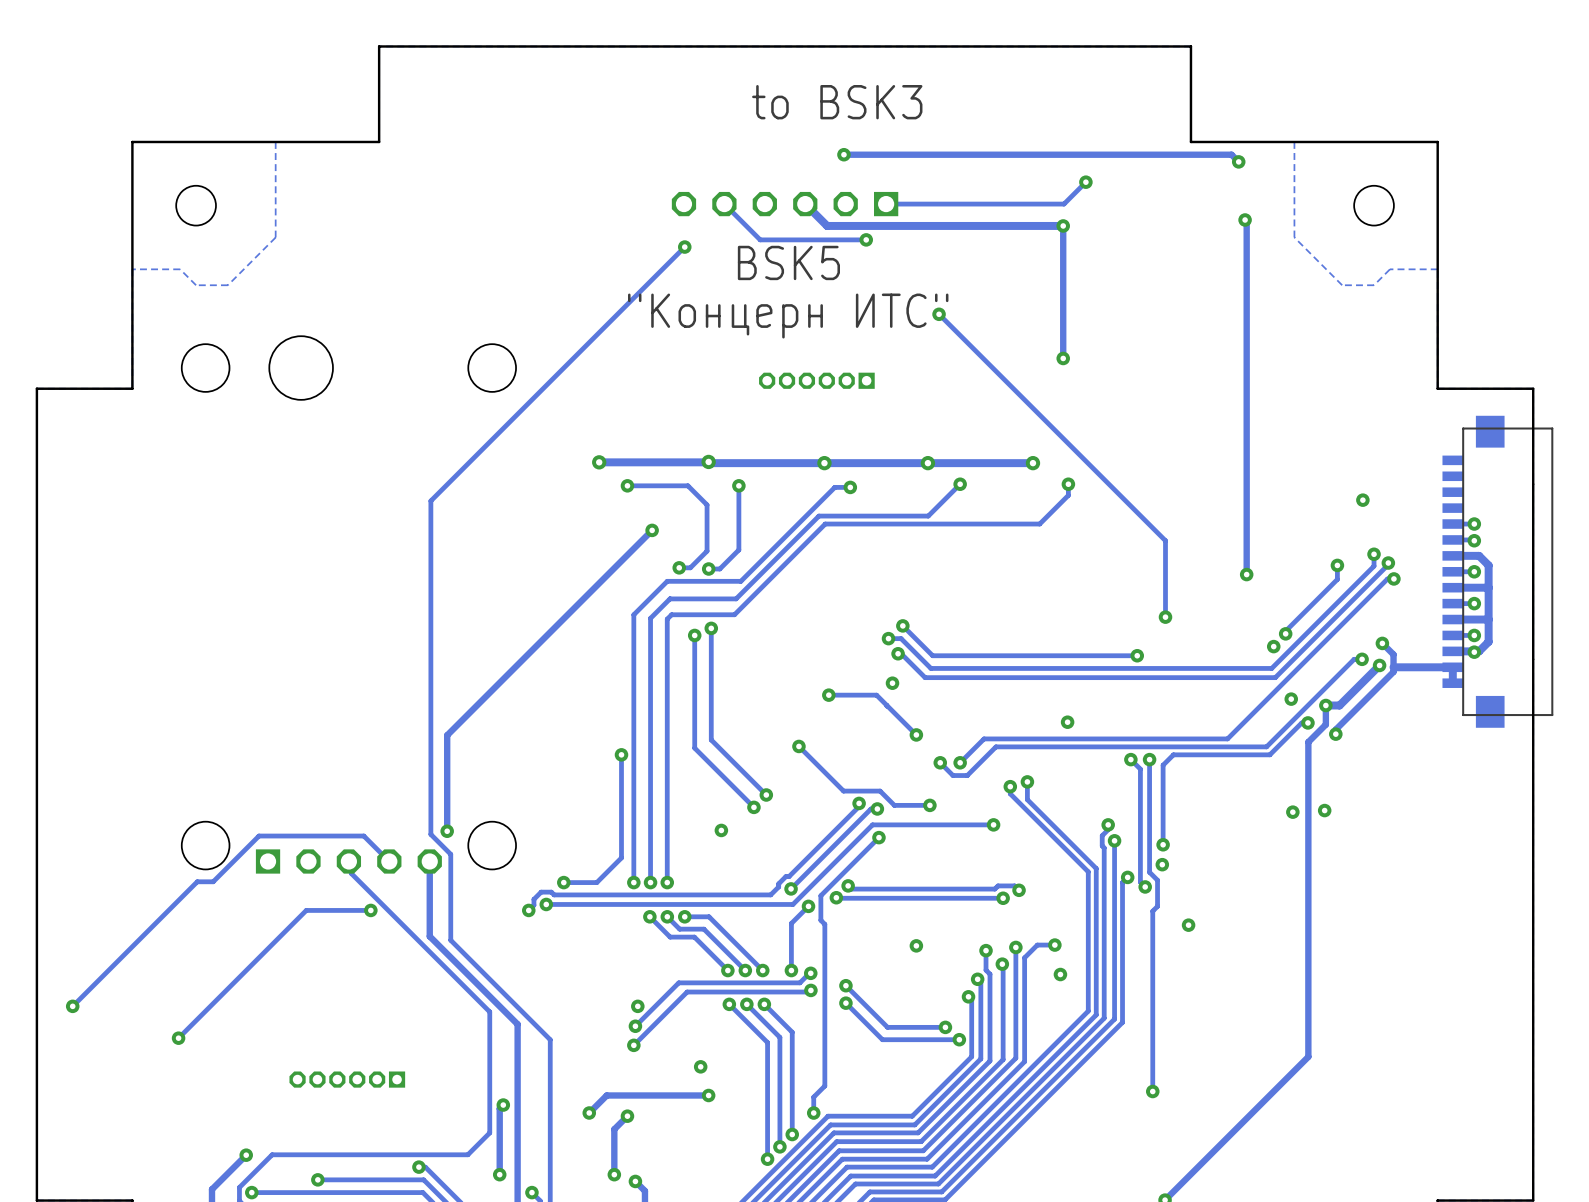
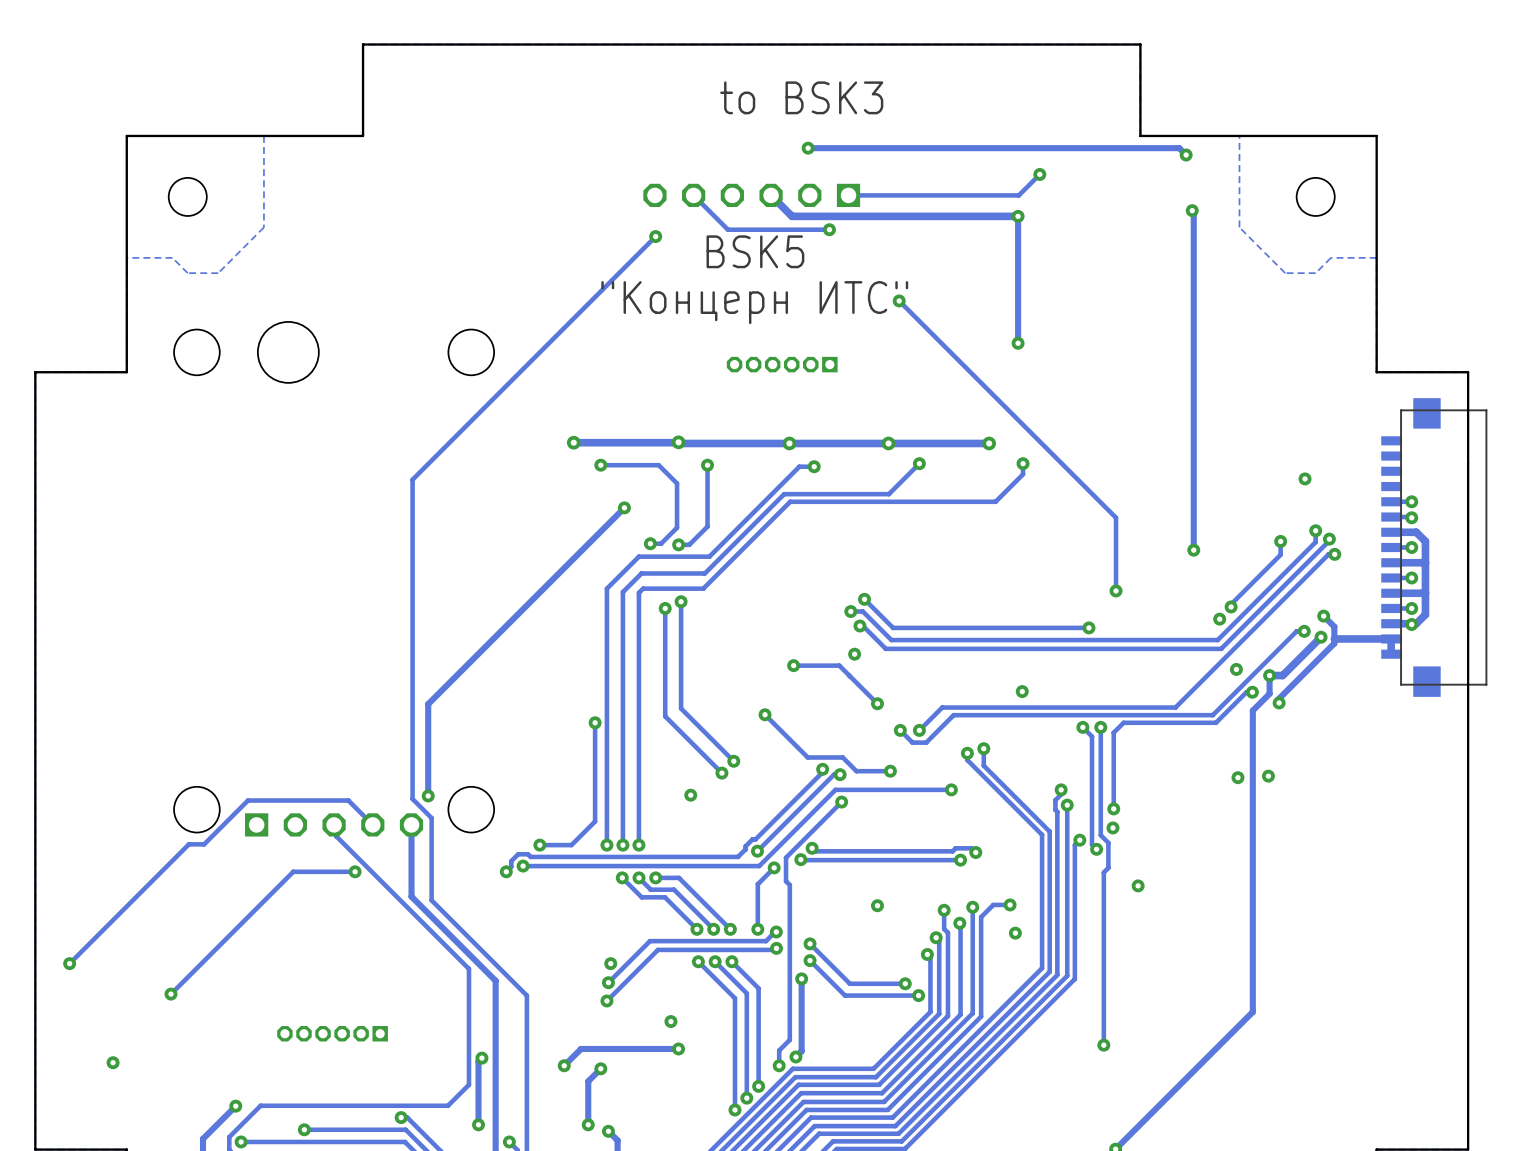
track: none -> (801, 978) (801, 1051) (795, 1056)
via: none -> (801, 978)
via: none -> (795, 1056)
via: none -> (113, 1062)

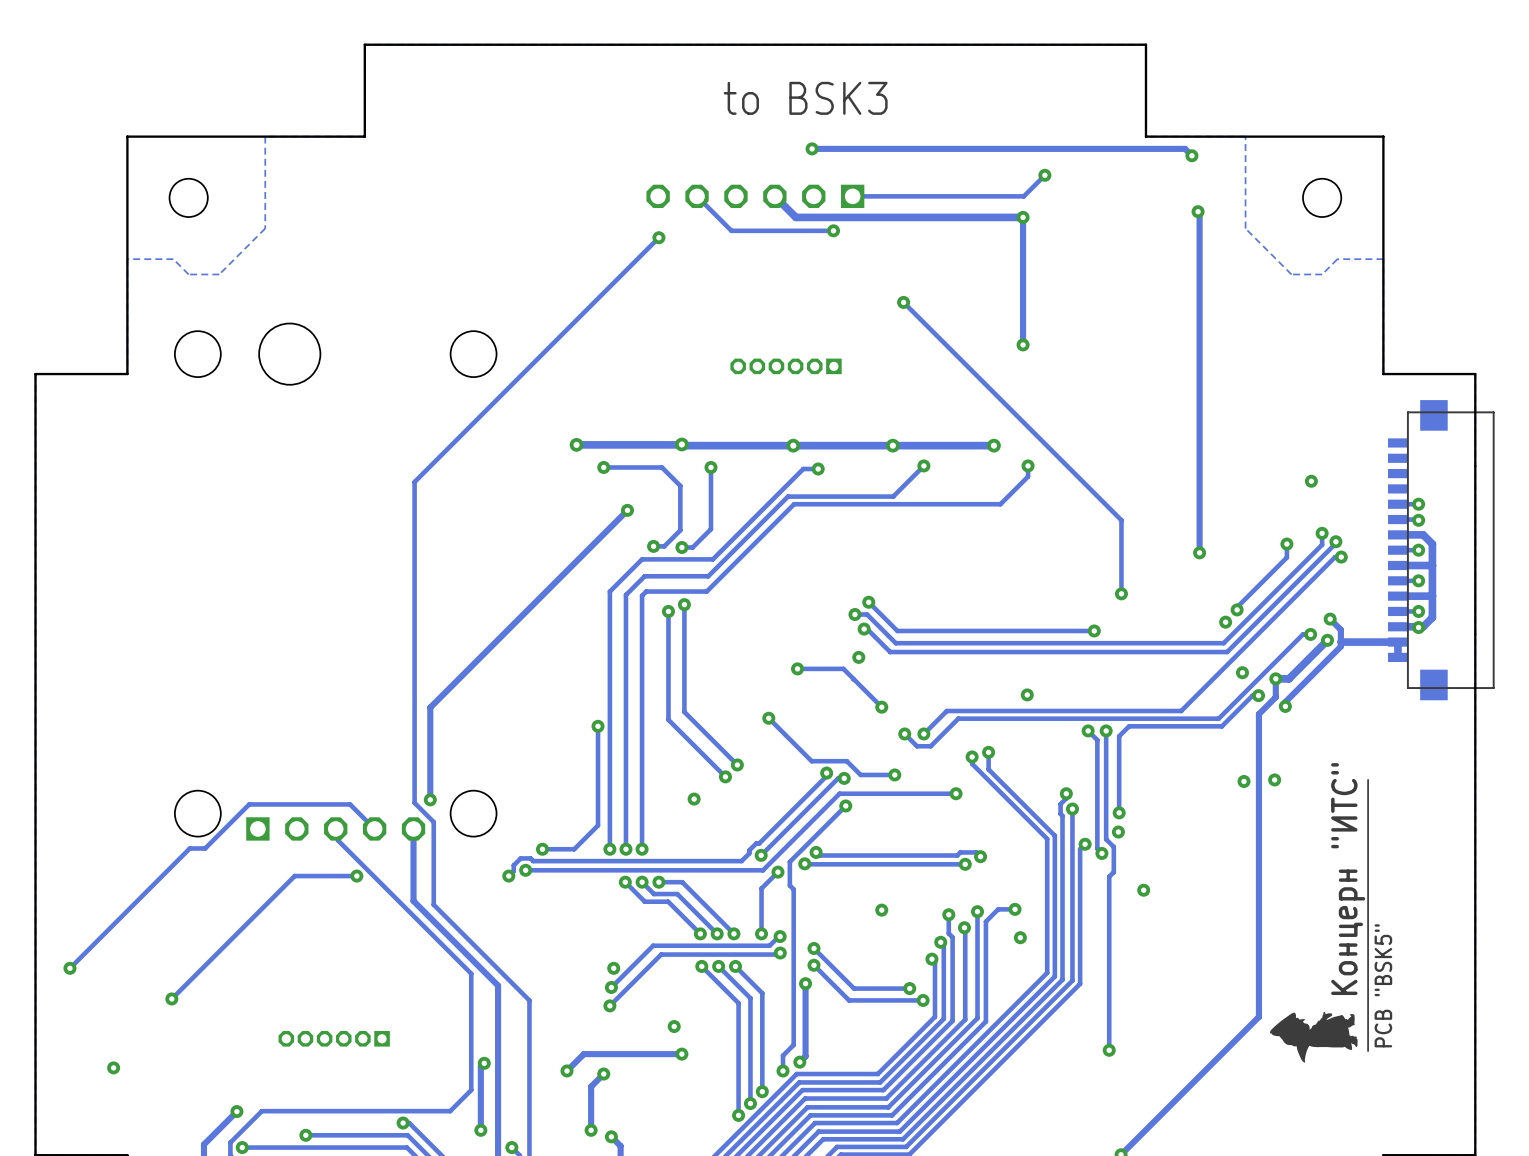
text: BSK5 (755, 251) -> none
text: "Концерн ИТС" (754, 302) -> none
drawing: none -> [1269, 779, 1369, 1063]

